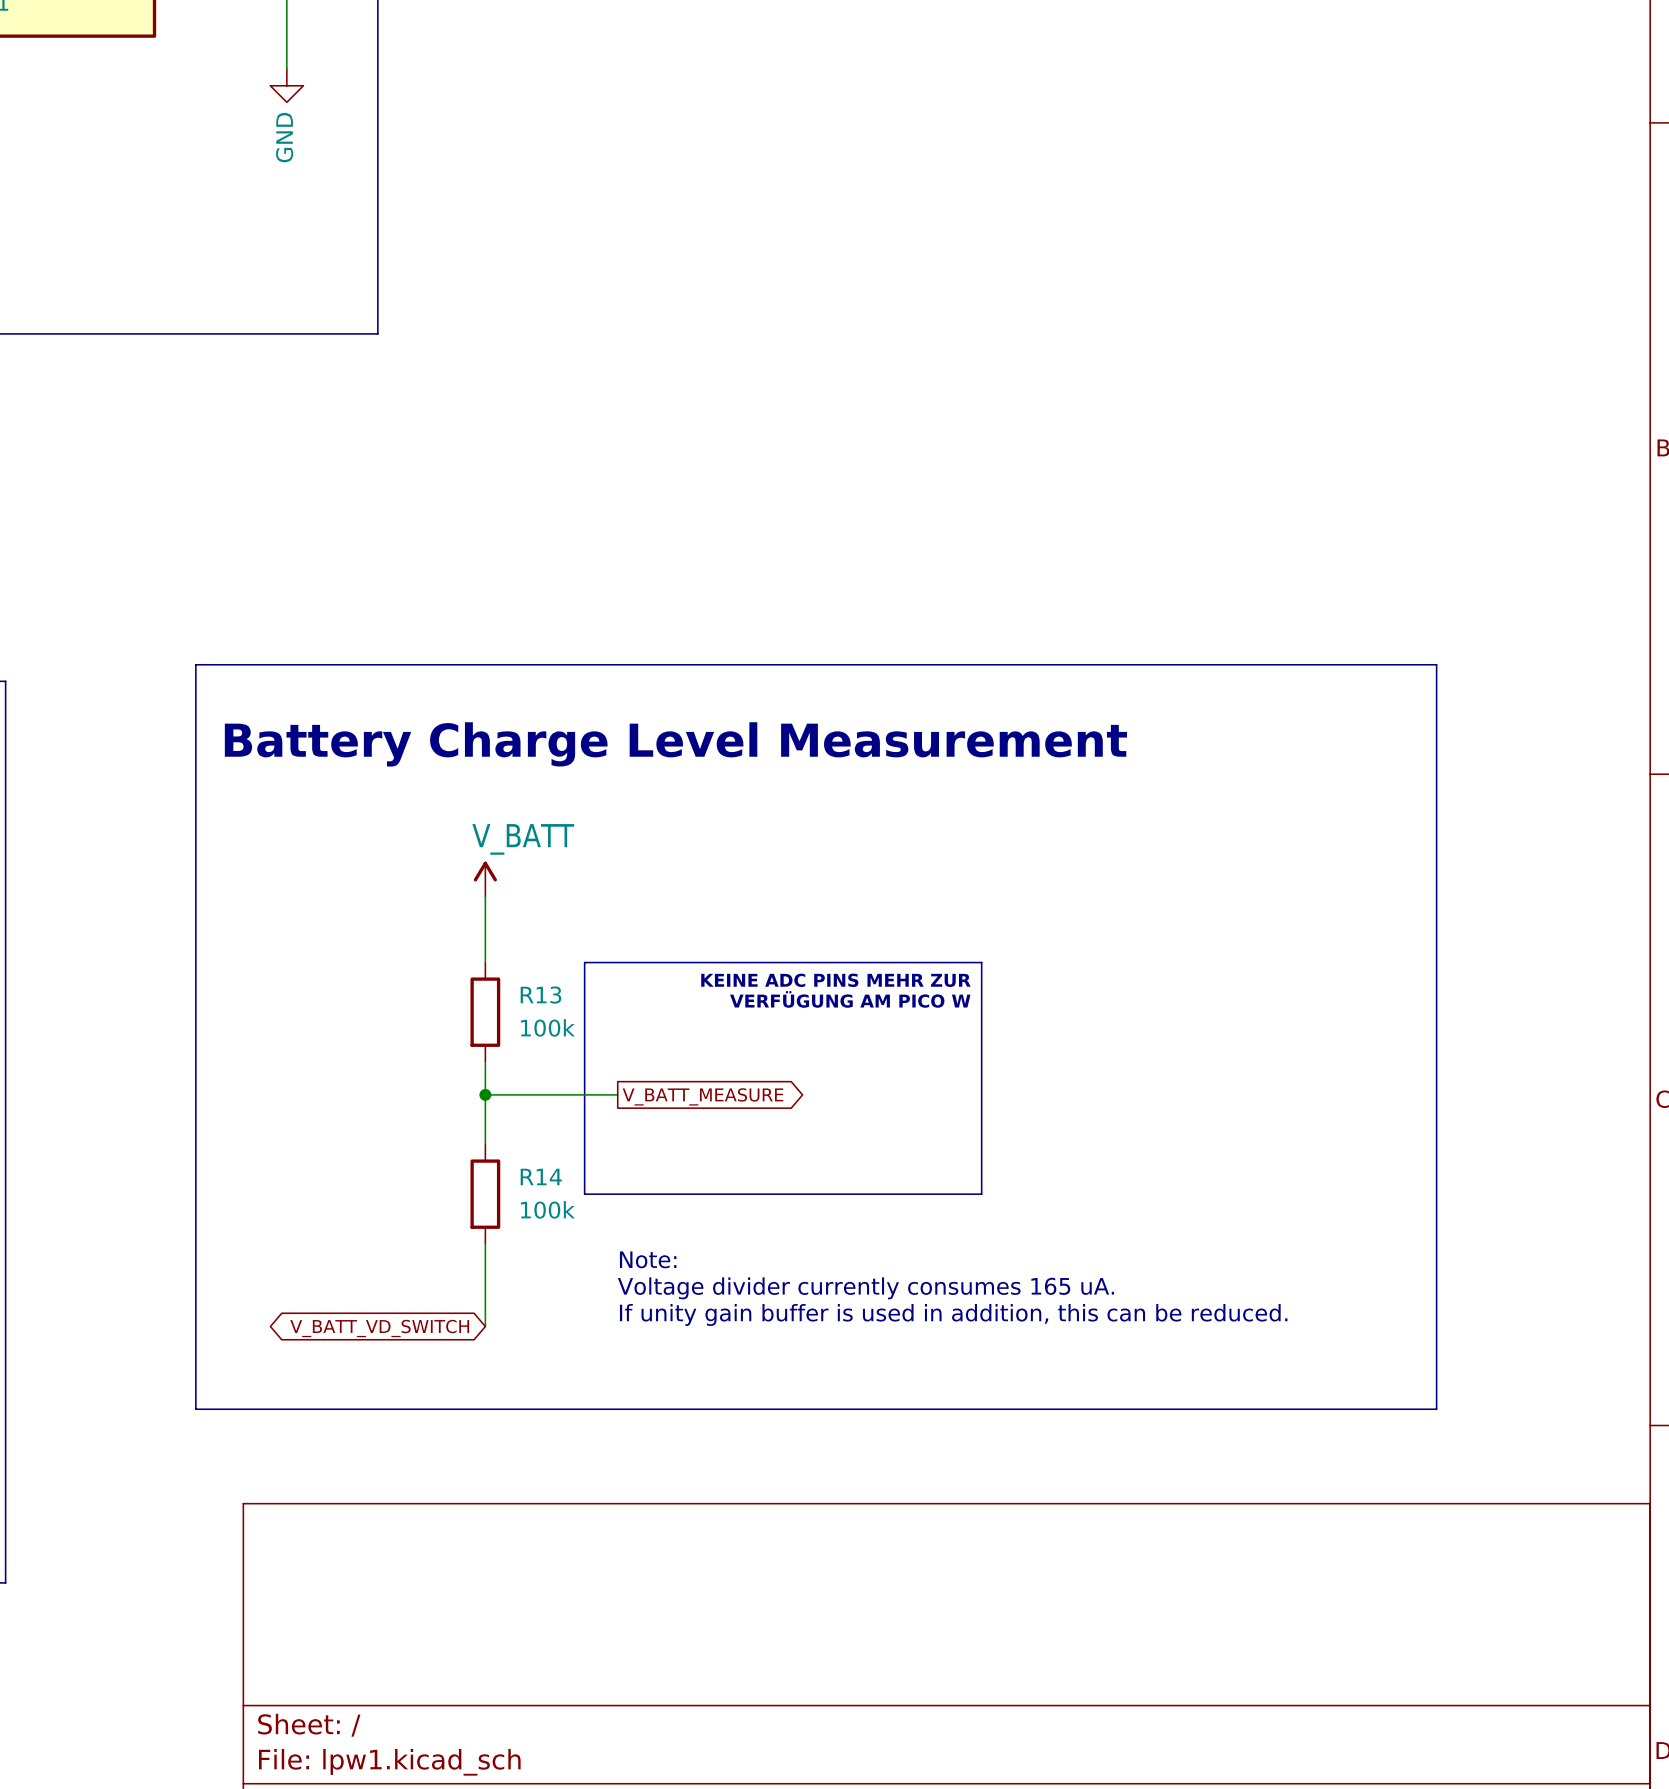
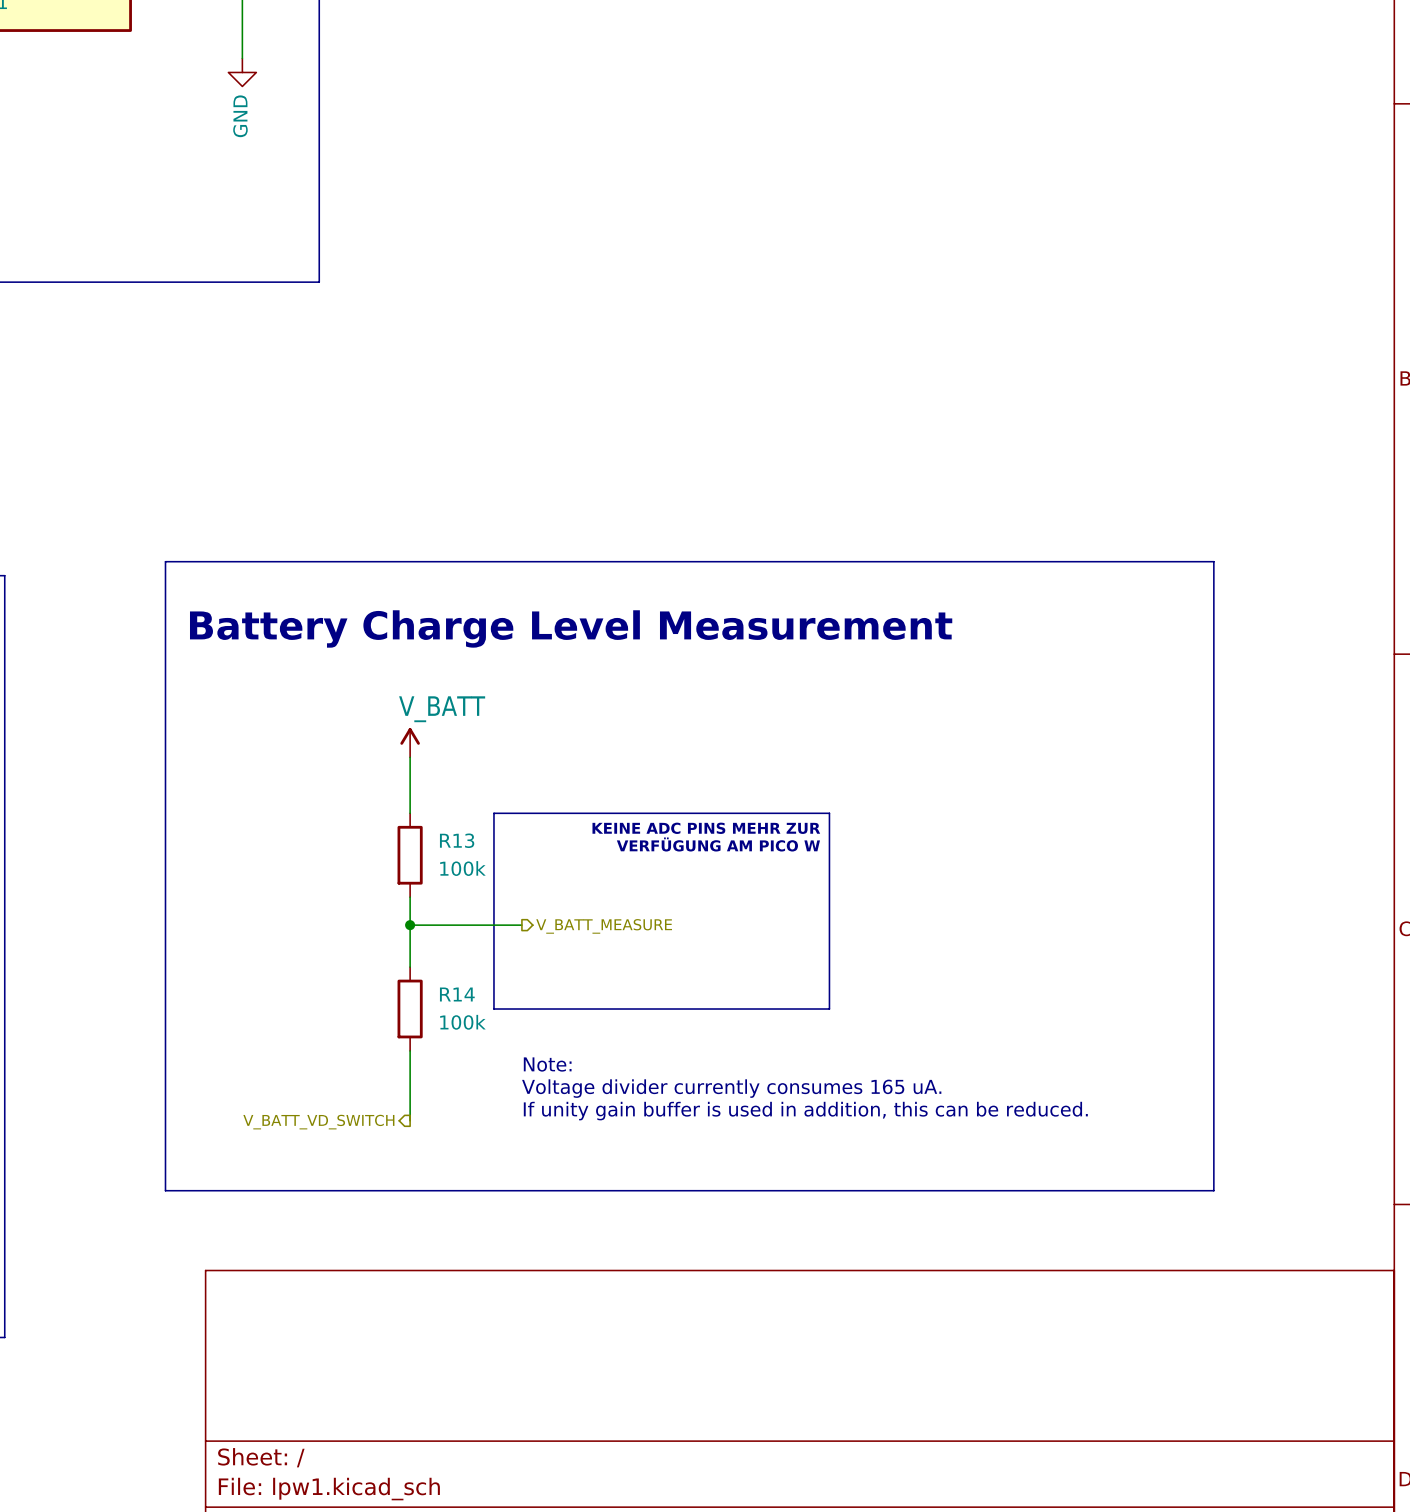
global label: V_BATT_MEASURE (703, 1096) -> none
hierarchical label: none -> V_BATT_MEASURE (604, 926)
hierarchical label: none -> V_BATT_VD_SWITCH (318, 1122)
global label: V_BATT_VD_SWITCH (379, 1328) -> none

